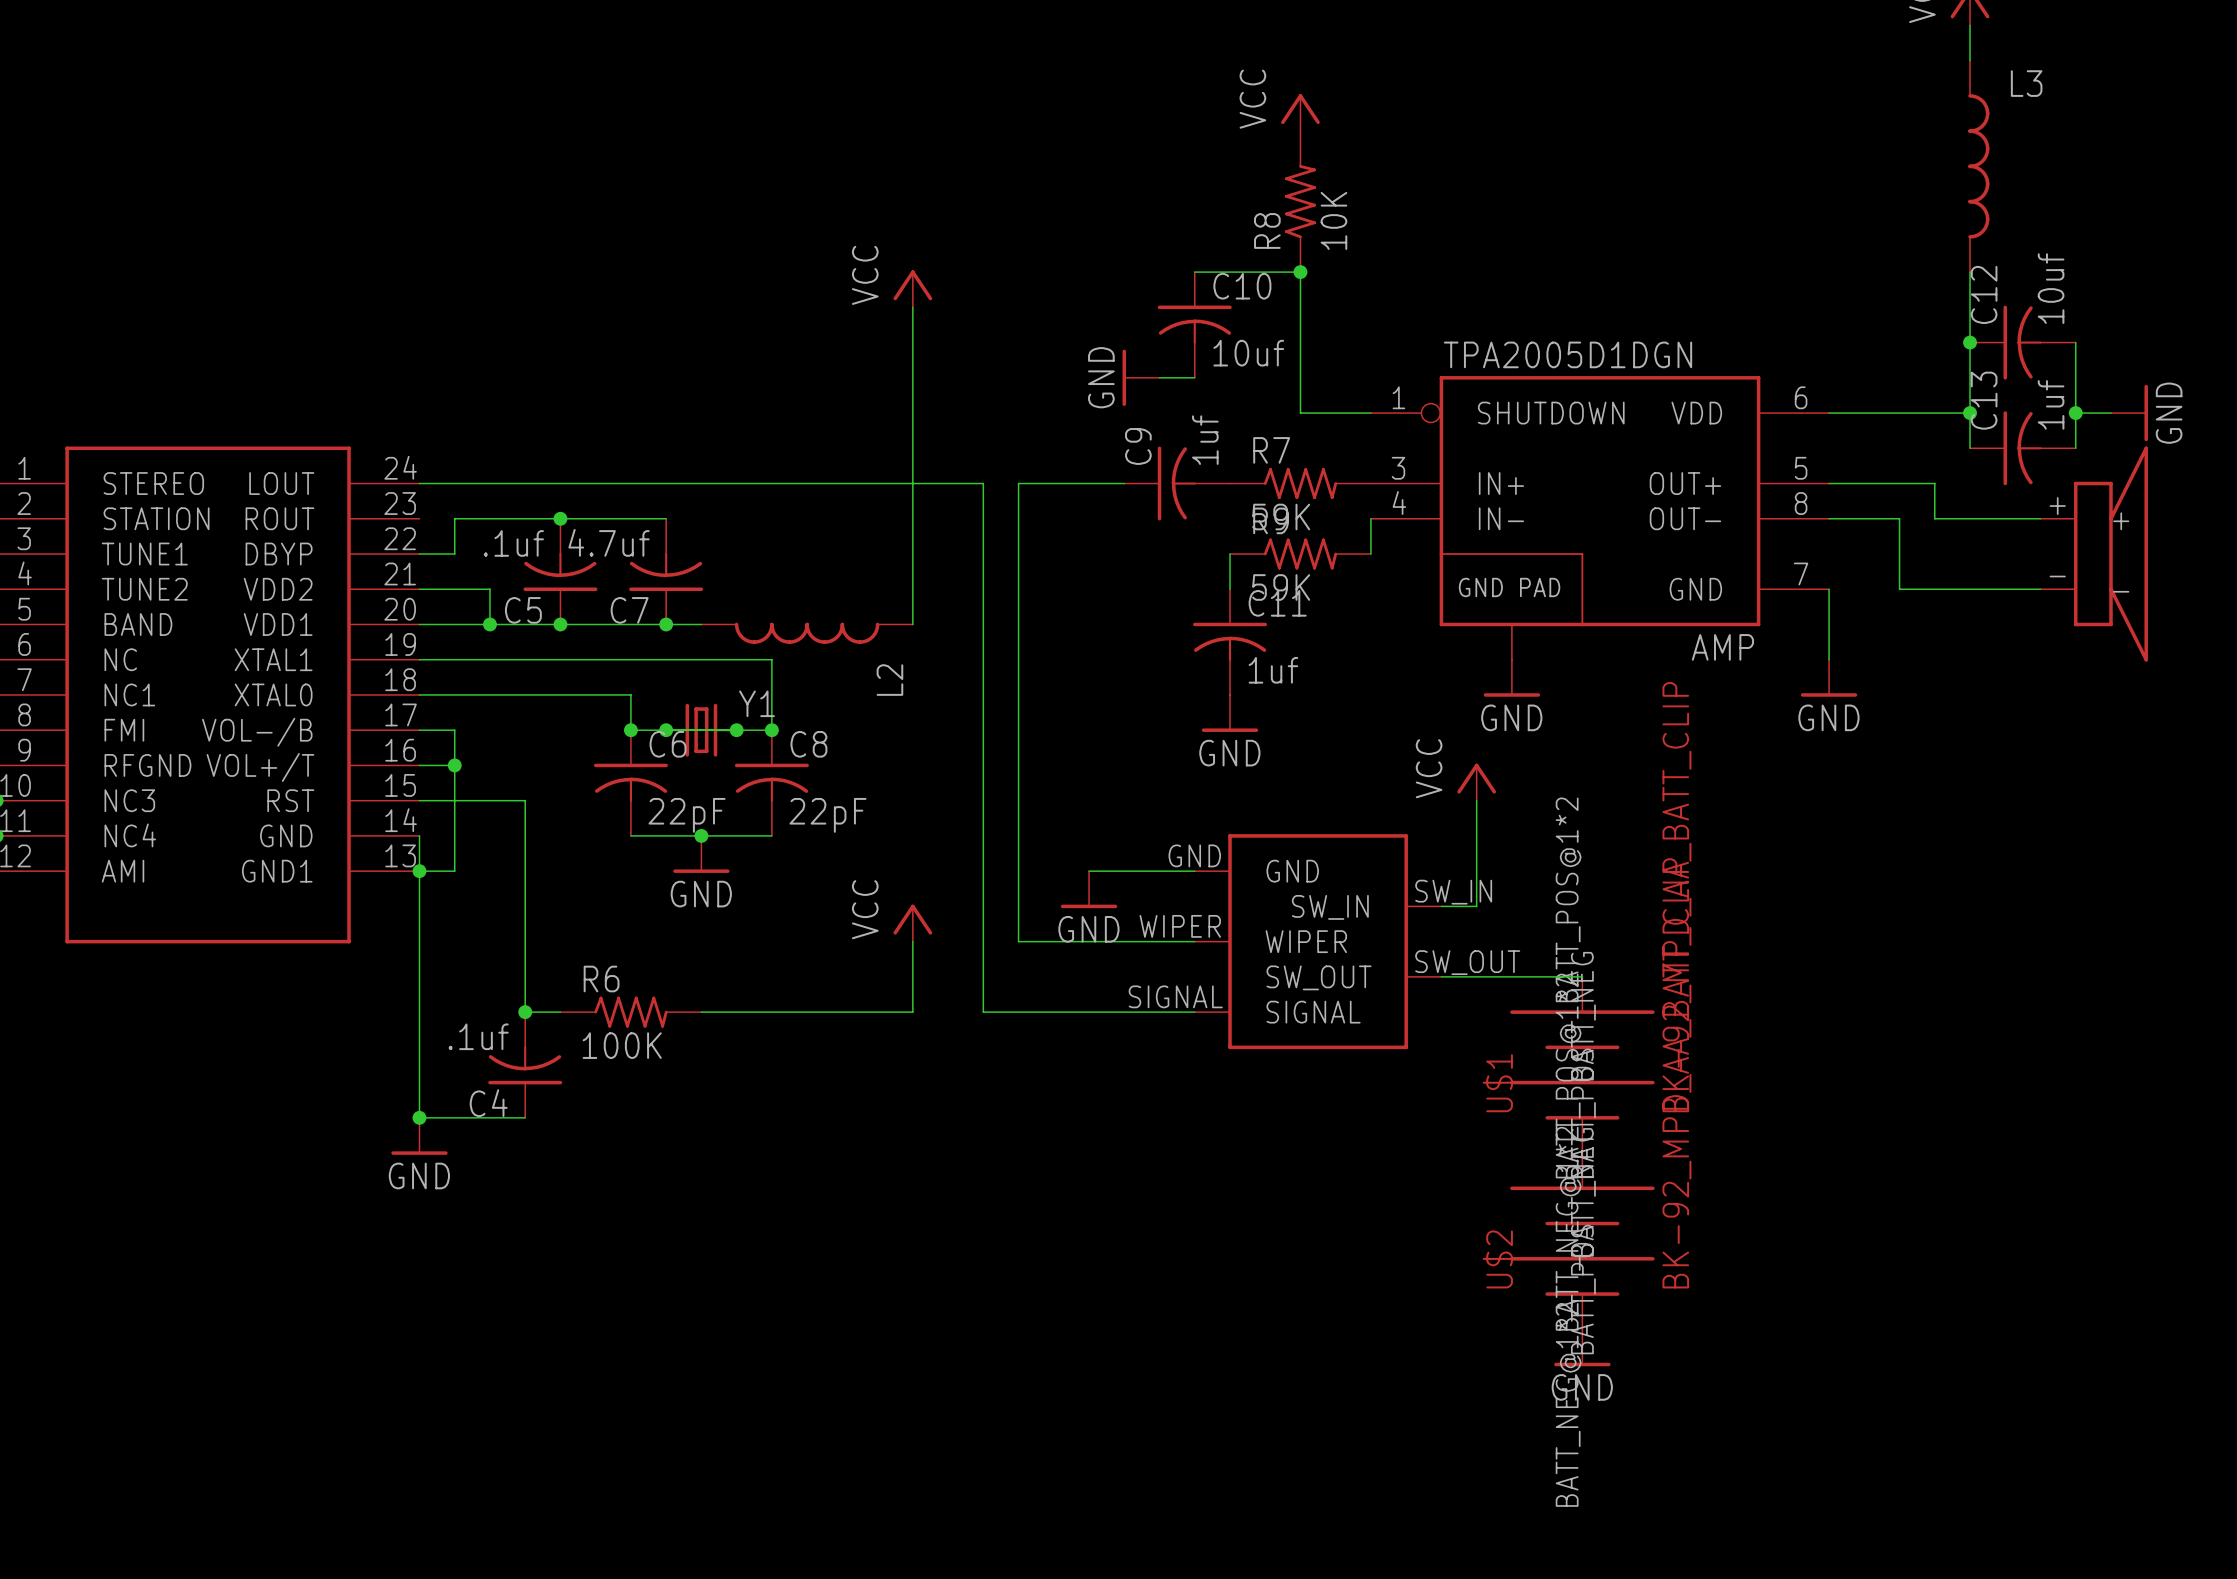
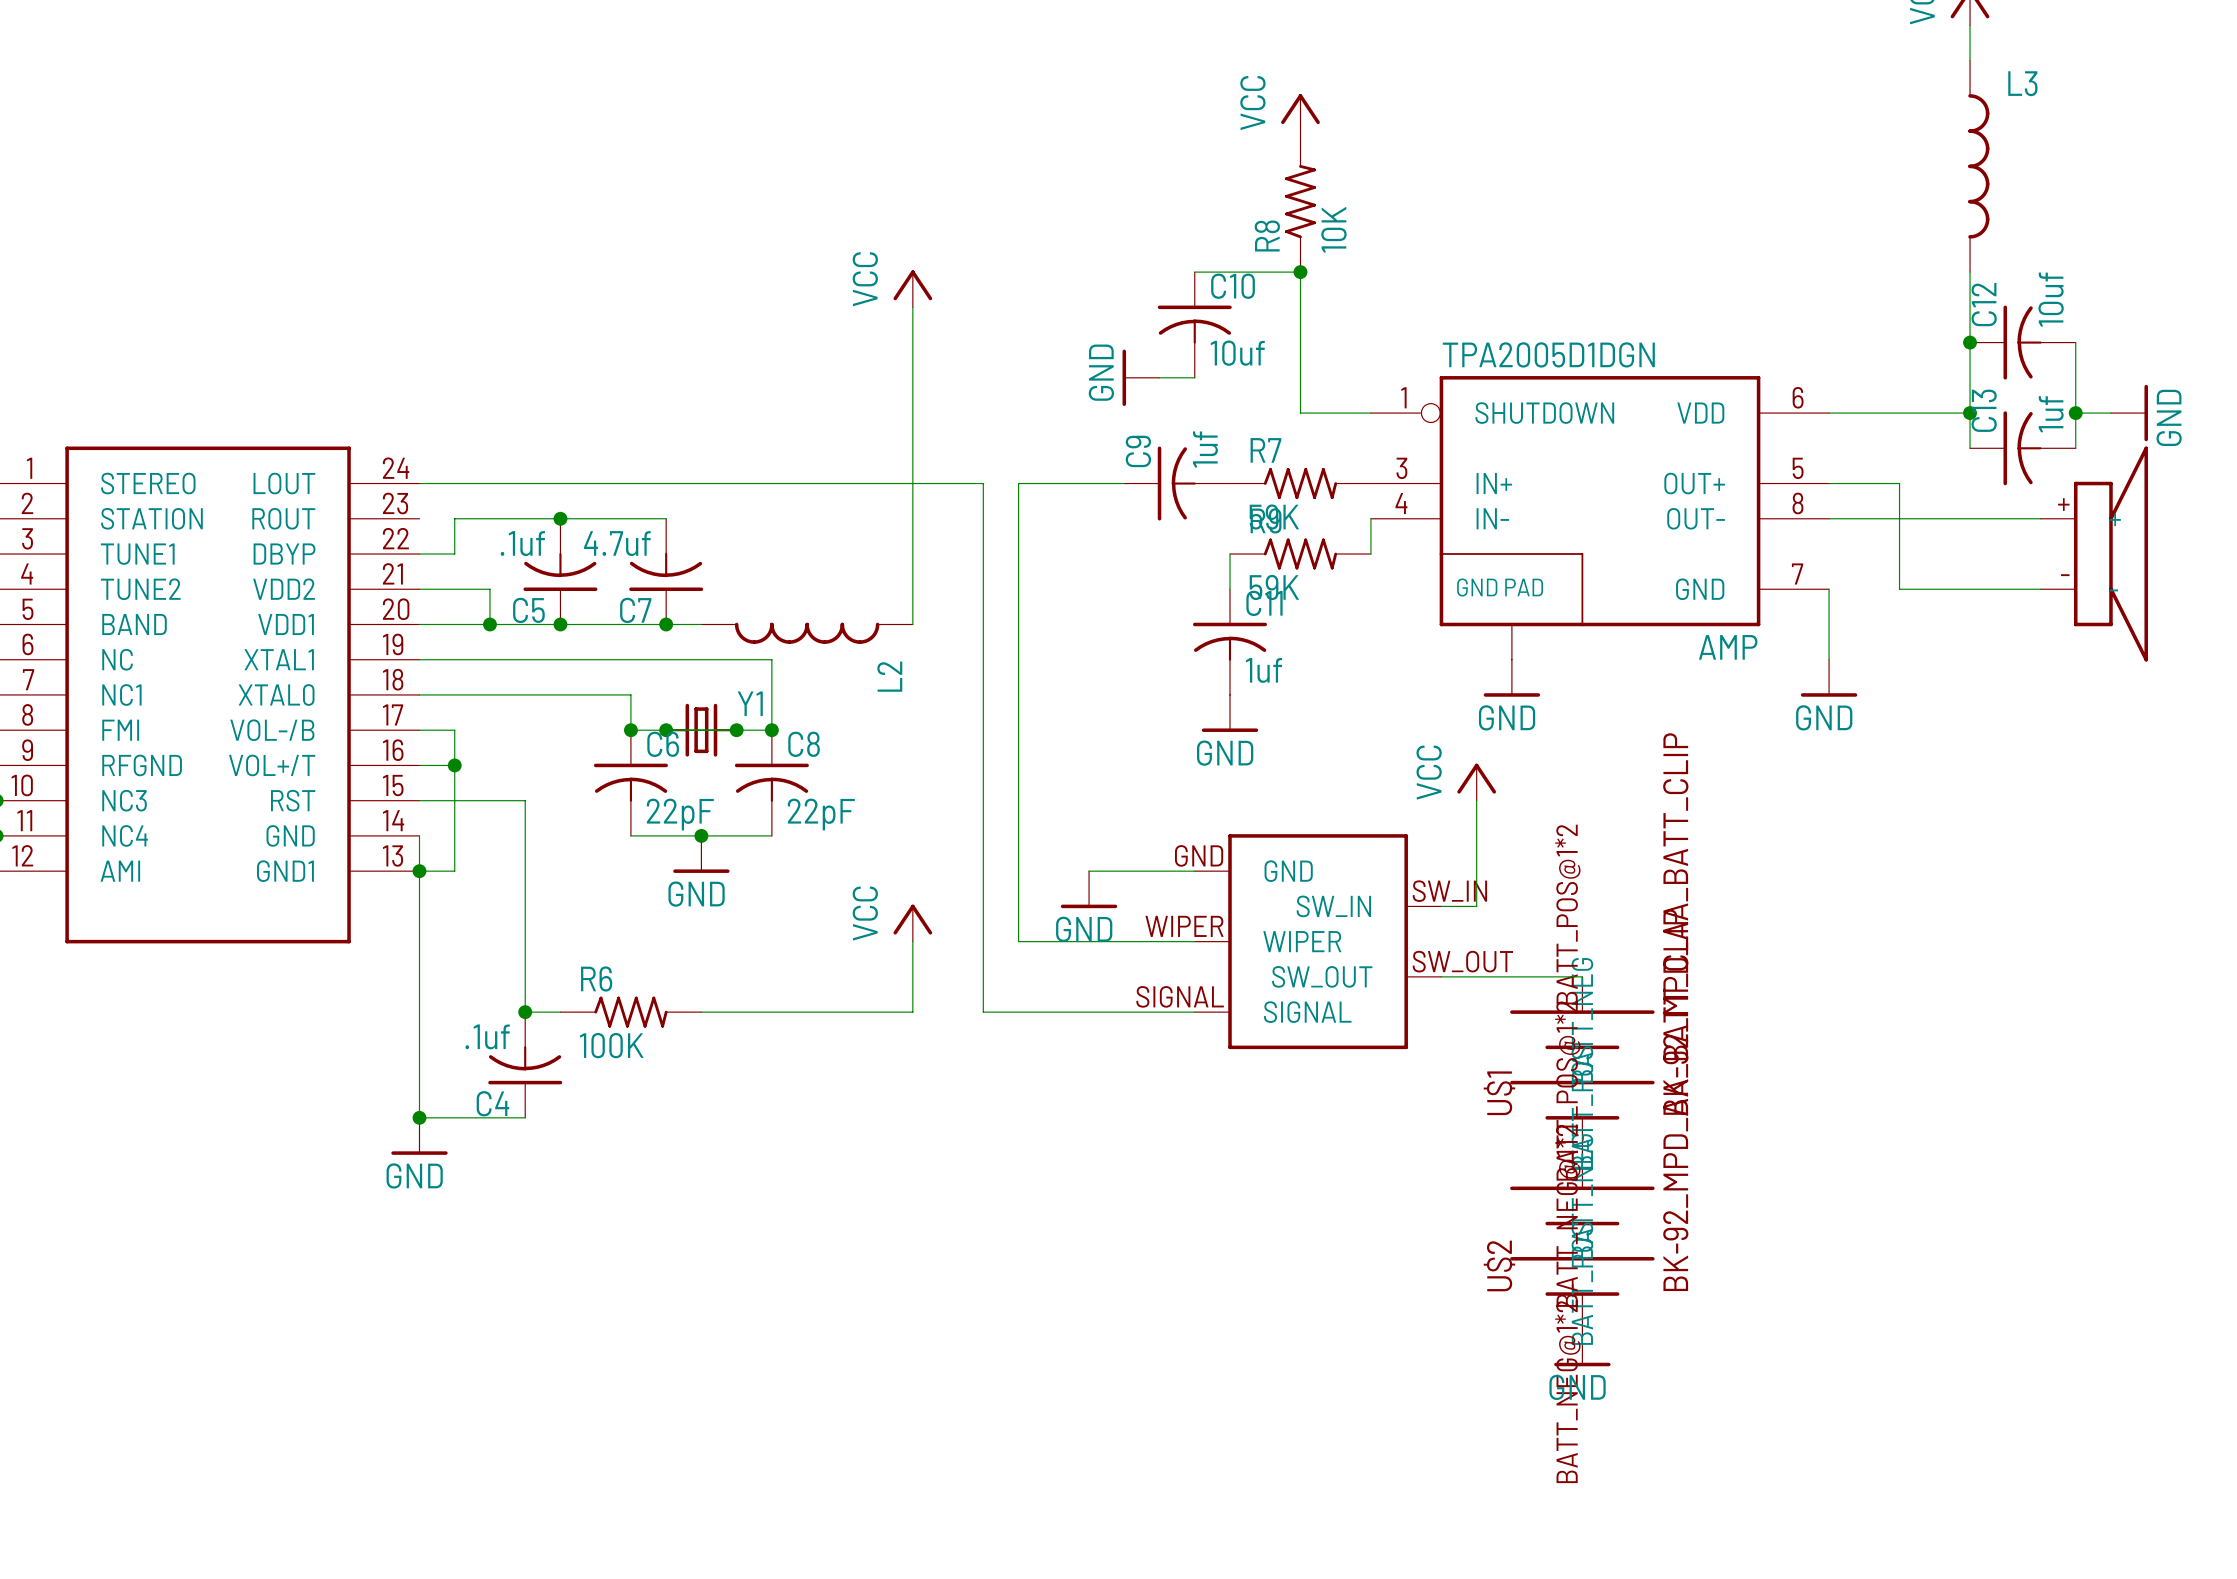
wire: (1899, 483) (1934, 483) (1934, 518) -> (1899, 483) (1899, 518) (1934, 518)

